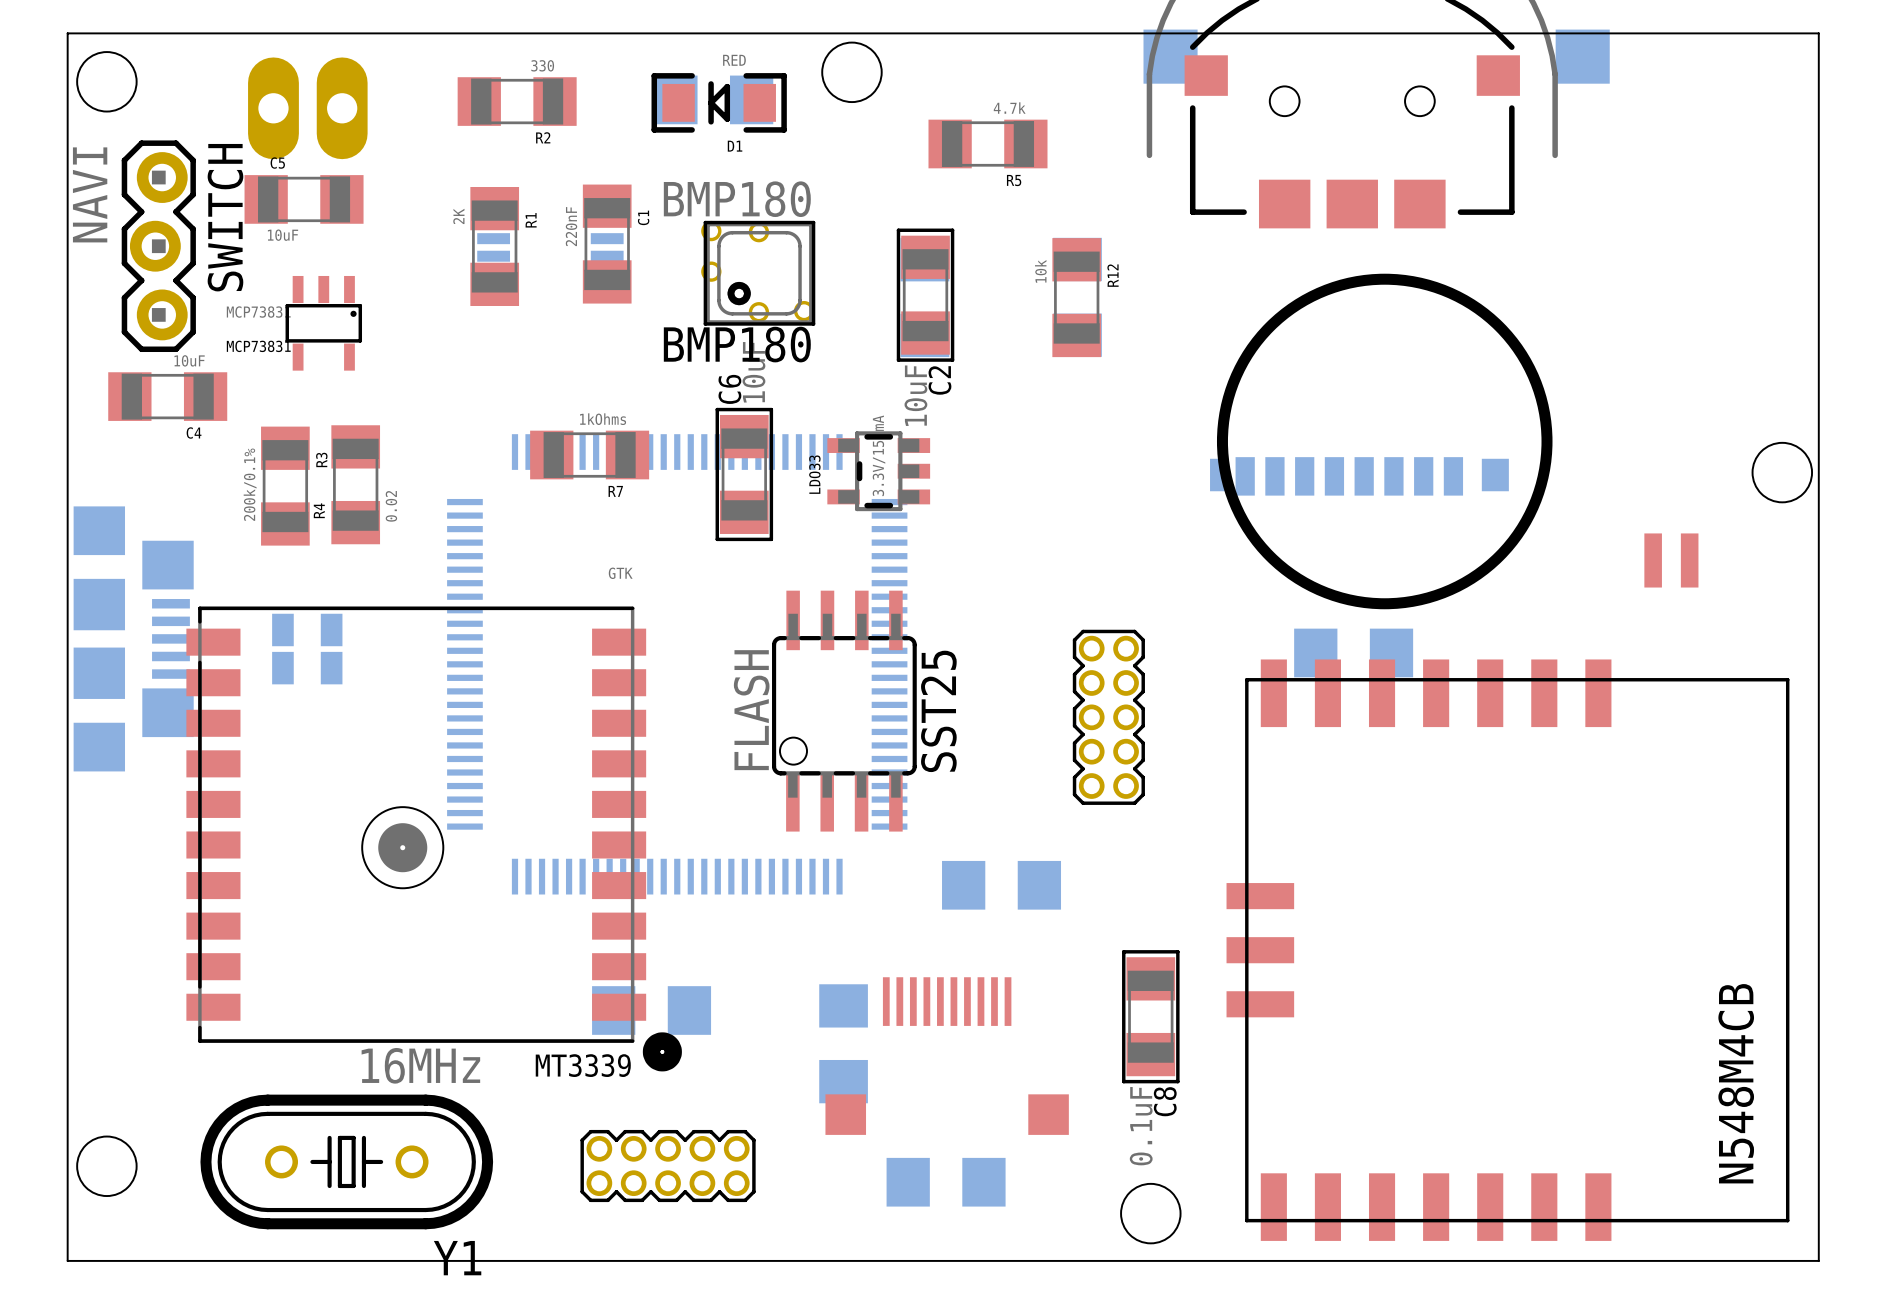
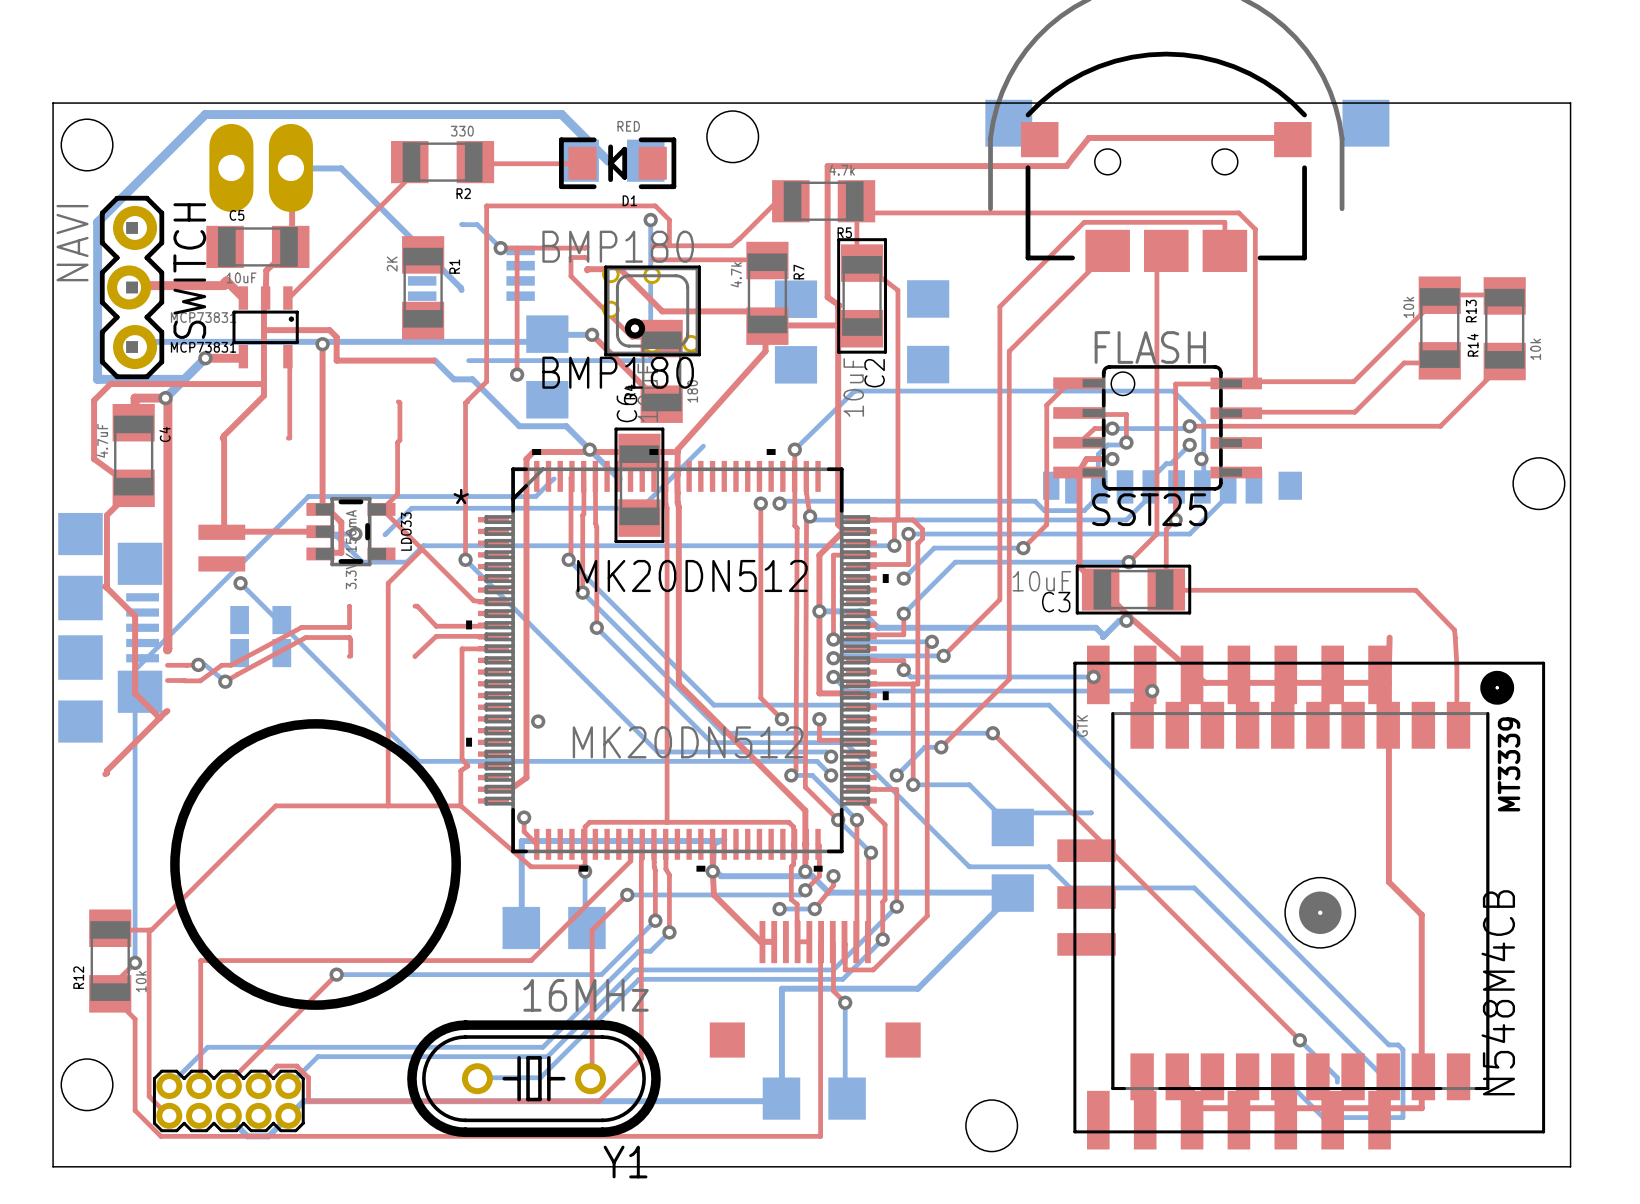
top track: none -> (1292, 139) (1292, 137) (1088, 137) (1066, 166) (827, 166) (827, 297) (839, 305) (838, 524) (842, 531)
bottom track: none -> (608, 161) (561, 114) (205, 114) (97, 222) (97, 379) (179, 379) (181, 381)
top track: none -> (409, 162) (409, 177) (287, 298)
top track: none -> (475, 162) (477, 163) (582, 163)
top track: none -> (290, 167) (292, 245) (266, 270) (265, 298) (263, 299) (263, 395) (222, 438) (224, 529) (221, 532) (320, 531)
bottom track: none -> (290, 167) (341, 168) (461, 290)
R5 position: (987, 143) -> (823, 201)
top track: none -> (790, 201) (777, 201) (731, 245) (652, 246)
top track: none -> (856, 201) (859, 212) (1238, 212) (1255, 229) (1255, 379) (1236, 383)
top track: none -> (856, 201) (856, 257) (897, 290) (897, 519)
bottom track: none -> (650, 219) (650, 360) (468, 360)
via: none -> (650, 219)
bottom track: none -> (461, 224) (477, 224) (500, 248)
top track: none -> (669, 245) (669, 219) (655, 205) (486, 205) (486, 381) (465, 402) (465, 559)
top track: none -> (587, 246) (500, 248)
via: none -> (500, 248)
top track: none -> (517, 248) (517, 374)
top track: none -> (1107, 250) (1009, 351) (1009, 679) (941, 747)
top track: none -> (1166, 250) (1156, 262) (1156, 534) (1128, 562)
top track: none -> (1224, 250) (1224, 222) (1084, 222) (999, 306) (999, 599) (943, 655)
top track: none -> (587, 258) (571, 257) (571, 276) (631, 337) (661, 338)
top track: none -> (652, 258) (767, 260)
top track: none -> (587, 270) (620, 269) (662, 311) (765, 311) (765, 325) (767, 326)
C1: 220nF (607, 244) -> none
top track: none -> (129, 287) (130, 285) (224, 285) (226, 280) (243, 298)
top track: none -> (1504, 295) (1439, 295) (1353, 381) (1236, 381) (1236, 383)
R12 value position: 10k (1040, 271) -> 10k (141, 981)
drawing: [1216, 273, 1553, 610] -> none
R12 name position: R12 (1113, 275) -> R12 (78, 977)
top track: none -> (767, 326) (765, 327) (765, 351) (677, 449) (678, 684) (805, 810) (805, 871)
top track: none -> (838, 325) (767, 326)
R13: none -> 10k (1439, 328)
R14: none -> 10k (1504, 328)
top track: none -> (263, 330) (329, 330) (336, 337) (336, 360) (433, 360)
C2 position: (925, 295) -> (862, 295)
R12 position: (1076, 297) -> (110, 961)
top track: none -> (592, 334) (661, 404)
bottom track: none -> (592, 334) (547, 334) (538, 341) (139, 341) (135, 347)
via: none -> (592, 334)
top track: none -> (322, 344) (322, 508) (320, 509) (329, 510) (341, 522) (341, 552) (320, 553)
via: none -> (322, 344)
MCP73831 position: (323, 323) -> (265, 327)
top track: none -> (243, 356) (242, 358) (205, 358)
top track: none -> (287, 356) (289, 358) (288, 438)
bottom track: none -> (205, 358) (165, 398)
via: none -> (205, 358)
bottom track: none -> (433, 360) (453, 379) (472, 379) (519, 426) (566, 426) (619, 478)
top track: none -> (1439, 360) (1438, 362) (1404, 362) (1354, 412) (1236, 413)
top track: none -> (1504, 361) (1440, 426) (1189, 426)
via: none -> (517, 374)
top track: none -> (1079, 383) (1067, 384) (1046, 405) (1046, 524) (1023, 548)
top track: none -> (1236, 383) (1175, 384) (1175, 519) (1166, 529) (1166, 589) (1415, 590) (1454, 630) (1456, 723) (1458, 725)
top track: none -> (263, 384) (110, 384) (94, 400) (94, 459) (133, 488) (106, 515) (106, 585) (105, 586) (135, 616) (135, 693) (159, 718)
C4 value: 10uF (189, 360) -> 4.7uF (102, 440)
via: none -> (165, 398)
top track: none -> (398, 401) (399, 402) (399, 440) (397, 442) (397, 494) (381, 509) (473, 600) (493, 601)
top track: none -> (1079, 412) (1079, 414) (1126, 414) (1126, 442)
C4 rotation: 0° (167, 396) -> 90° clockwise (133, 455)
top track: none -> (133, 422) (135, 398) (165, 398) (167, 400) (167, 650)
bottom track: none -> (1189, 426) (1187, 428) (1112, 428)
via: none -> (1189, 426)
top track: none -> (1112, 428) (1094, 428) (1079, 442)
via: none -> (1112, 428)
R7 value: 1kOhms (603, 419) -> 4.7k (736, 274)
bottom track: none -> (1126, 442) (1124, 444) (1107, 444) (1098, 454) (1098, 496) (1084, 510) (1044, 510) (1035, 501) (781, 501) (779, 503)
via: none -> (1126, 442)
bottom track: none -> (1189, 444) (1170, 463) (1166, 463) (1152, 477) (1149, 496) (1126, 519) (812, 519) (810, 516)
via: none -> (1189, 444)
bottom track: none -> (703, 446) (641, 508) (411, 508) (384, 534)
C4 name position: C4 (194, 433) -> C4 (165, 434)
via: none -> (589, 449)
top track: none -> (794, 449) (794, 525) (797, 528) (795, 770) (791, 775)
bottom track: none -> (794, 449) (854, 391) (1173, 391) (1203, 421) (1202, 486)
via: none -> (794, 449)
top track: none -> (677, 452) (533, 452) (526, 459) (526, 777) (510, 789) (493, 789)
top track: none -> (1112, 459) (1086, 459) (1079, 472) (1079, 566) (1129, 617)
via: none -> (1112, 459)
via: none -> (1201, 459)
R7 rotation: 0° (589, 455) -> 90° clockwise (767, 293)
R7 position: (589, 455) -> (767, 293)
top track: none -> (571, 476) (571, 557) (568, 559)
top track: none -> (583, 476) (582, 592)
top track: none -> (595, 476) (596, 627)
top track: none -> (665, 476) (667, 822)
top track: none -> (806, 476) (810, 516) (806, 521) (805, 787) (838, 819)
bottom track: none -> (554, 478) (535, 496) (308, 496) (135, 669) (135, 962)
LDO33 rotation: 0° (878, 471) -> 180° (350, 531)
LDO33 position: (878, 471) -> (350, 531)
bottom track: none -> (1228, 486) (1227, 496) (1189, 534) (908, 534)
R4 position: (355, 484) -> (661, 371)
R3 side: top (285, 486) -> bottom (547, 366)
R7 name position: R7 (615, 491) -> R7 (798, 272)
top track: none -> (760, 503) (760, 698) (781, 719)
via: none -> (760, 503)
via: none -> (779, 503)
R4 value: 0.02 (391, 506) -> 180 (692, 391)
via: none -> (810, 516)
top track: none -> (861, 519) (913, 519) (922, 529) (922, 538) (917, 543) (917, 684) (861, 684)
top track: none -> (894, 519) (894, 545)
via: none -> (1175, 519)
top track: none -> (842, 531) (819, 555) (819, 693) (859, 693) (861, 695)
bottom track: none -> (355, 534) (319, 534) (336, 536) (362, 562) (406, 562) (423, 545) (894, 545)
via: none -> (355, 534)
top track: none -> (908, 534) (908, 564) (861, 564) (861, 566)
via: none -> (908, 534)
via: none -> (894, 545)
part: none -> (221, 548)
bottom track: none -> (1023, 548) (934, 548) (903, 578)
via: none -> (1023, 548)
top track: none -> (422, 549) (388, 583) (388, 805)
top track: none -> (861, 554) (833, 555) (833, 639)
bottom track: none -> (465, 559) (657, 751) (826, 751) (831, 756)
via: none -> (465, 559)
bottom track: none -> (568, 559) (713, 705) (1049, 705) (1388, 1044) (1398, 1044) (1402, 1049) (1402, 1117) (1323, 1117) (1290, 1084) (1290, 1082)
via: none -> (568, 559)
part: (1671, 560) -> none
bottom track: none -> (1128, 562) (955, 562) (903, 613)
via: none -> (1128, 562)
via: none -> (903, 578)
bottom track: none -> (240, 583) (418, 761) (817, 761) (831, 775)
via: none -> (240, 583)
bottom track: none -> (582, 592) (723, 733) (992, 733)
via: none -> (582, 592)
top track: none -> (349, 606) (349, 627) (301, 627) (231, 665) (221, 665) (200, 680) (167, 680)
top track: none -> (414, 606) (417, 606) (436, 626) (493, 625)
bottom track: none -> (819, 611) (861, 610) (878, 627) (1095, 627) (1103, 636) (1119, 620) (1126, 620)
via: none -> (819, 611)
top track: none -> (903, 613) (903, 634) (861, 634) (861, 636)
via: none -> (903, 613)
top track: none -> (1129, 617) (1204, 682) (1388, 682)
via: none -> (1126, 620)
bottom track: none -> (596, 627) (711, 742) (845, 742) (969, 866) (1049, 866) (1070, 887) (1194, 887) (1384, 1077) (1384, 1082)
via: none -> (596, 627)
top track: none -> (493, 637) (436, 636) (415, 656)
top track: none -> (1389, 637) (1388, 882) (1421, 914) (1421, 1075) (1423, 1076) (1421, 1077) (1421, 1108) (1199, 1108) (1192, 1101) (1192, 1091) (1177, 1076)
bottom track: none -> (833, 639) (835, 641) (931, 641)
via: none -> (833, 639)
C3 side: bottom (1353, 652) -> top (1133, 589)
top track: none -> (931, 641) (927, 646) (927, 916) (873, 969) (845, 969) (844, 942)
via: none -> (931, 641)
top track: none -> (493, 648) (462, 648) (462, 759) (467, 766) (460, 770) (460, 805)
MK20DN512 side: bottom (677, 664) -> top (677, 660)
top track: none -> (349, 656) (349, 637) (305, 637) (225, 681)
bottom track: none -> (943, 655) (835, 655) (833, 658)
via: none -> (943, 655)
via: none -> (833, 658)
top track: none -> (861, 660) (903, 660) (903, 669)
top track: none -> (198, 664) (167, 665)
bottom track: none -> (198, 664) (205, 664) (225, 681)
via: none -> (198, 664)
bottom track: none -> (903, 669) (910, 676) (1093, 676)
via: none -> (903, 669)
bottom track: none -> (833, 676) (847, 691) (1152, 691)
via: none -> (833, 676)
via: none -> (1093, 676)
via: none -> (225, 681)
top track: none -> (913, 684) (913, 784)
SST25 rotation: 0° (844, 711) -> 90° clockwise (1157, 427)
SST25 position: (844, 711) -> (1157, 427)
via: none -> (1152, 691)
part: (1108, 717) -> none
top track: none -> (167, 710) (105, 774)
drawing: none -> [170, 719, 461, 1010]
via: none -> (781, 719)
top track: none -> (819, 719) (819, 740) (859, 740) (861, 742)
via: none -> (819, 719)
via: none -> (538, 721)
top track: none -> (992, 733) (1299, 1040)
via: none -> (992, 733)
bottom track: none -> (941, 747) (924, 747) (896, 775)
via: none -> (941, 747)
via: none -> (831, 756)
bottom track: none -> (791, 775) (812, 775) (856, 819)
via: none -> (791, 775)
via: none -> (831, 775)
via: none -> (896, 775)
bottom track: none -> (913, 784) (969, 784) (1012, 827) (1028, 812) (1091, 812)
via: none -> (913, 784)
top track: none -> (861, 789) (896, 789) (896, 906)
MT3339 rotation: 0° (434, 839) -> 90° counterclockwise (1312, 885)
MT3339 position: (434, 839) -> (1312, 885)
top track: none -> (861, 801) (885, 824) (885, 899) (882, 901) (882, 939)
top track: none -> (460, 805) (275, 805) (151, 930) (111, 930) (110, 928)
top track: none -> (460, 805) (531, 866) (582, 866) (585, 871) (585, 826) (589, 822) (788, 822) (793, 826) (791, 899) (797, 904) (797, 942) (809, 942)
top track: none -> (524, 817) (524, 831) (536, 844)
via: none -> (524, 817)
bottom track: none -> (838, 819) (870, 852)
via: none -> (838, 819)
top track: none -> (856, 819) (856, 942)
via: none -> (856, 819)
part: (1001, 885) -> none
top track: none -> (642, 844) (641, 1059) (599, 1101) (308, 1101) (308, 1077) (296, 1066) (276, 1066) (258, 1086)
top track: none -> (653, 844) (655, 920)
top track: none -> (665, 844) (665, 869) (669, 875) (669, 932)
top track: none -> (712, 844) (713, 894) (760, 941) (774, 942)
top track: none -> (818, 844) (819, 876) (805, 890)
top track: none -> (630, 844) (630, 860) (531, 960) (200, 960) (200, 1084) (199, 1086)
top track: none -> (870, 852) (868, 855) (867, 942)
via: none -> (870, 852)
bottom track: none -> (585, 871) (585, 927) (586, 927)
via: none -> (585, 871)
via: none -> (712, 871)
via: none -> (805, 871)
top track: none -> (833, 876) (833, 885) (814, 909)
via: none -> (833, 876)
bottom track: none -> (805, 890) (800, 894) (627, 894)
via: none -> (805, 890)
top track: none -> (627, 894) (592, 930) (592, 1077) (590, 1078)
via: none -> (627, 894)
bottom track: none -> (896, 906) (833, 969) (634, 969) (547, 1056) (317, 1056) (288, 1086)
via: none -> (896, 906)
bottom track: none -> (779, 909) (814, 909)
via: none -> (779, 909)
via: none -> (814, 909)
bottom track: none -> (655, 920) (601, 974) (336, 974)
via: none -> (655, 920)
bottom track: none -> (521, 927) (521, 841) (724, 839) (713, 843) (712, 871) (716, 871) (720, 876) (812, 876) (828, 892) (1012, 893) (917, 988) (781, 988) (781, 1096) (779, 1101) (303, 1101) (268, 1136) (247, 1136) (228, 1115)
top track: none -> (149, 930) (149, 1096) (169, 1115)
bottom track: none -> (669, 932) (650, 951) (638, 951) (542, 1047) (207, 1047) (169, 1086)
via: none -> (669, 932)
bottom track: none -> (882, 939) (842, 979) (638, 979) (540, 1077) (477, 1078)
via: none -> (882, 939)
top track: none -> (821, 942) (820, 1136) (160, 1136) (135, 1110) (135, 1019) (110, 993) (111, 986) (135, 962)
top track: none -> (832, 942) (833, 991) (845, 1002)
part position: (651, 1010) -> (554, 927)
C8 side: top (1150, 1016) -> bottom (1012, 860)
via: none -> (135, 962)
top track: none -> (336, 974) (228, 1082) (228, 1086)
via: none -> (336, 974)
part: (843, 1043) -> none
bottom track: none -> (845, 1002) (845, 1096) (847, 1098)
via: none -> (845, 1002)
Y1 footprint: [200, 1094, 494, 1230] -> [407, 1020, 661, 1138]
bottom track: none -> (1299, 1040) (1337, 1077) (1337, 1082)
via: none -> (1299, 1040)
part: (668, 1166) -> none
part: none -> (228, 1100)

